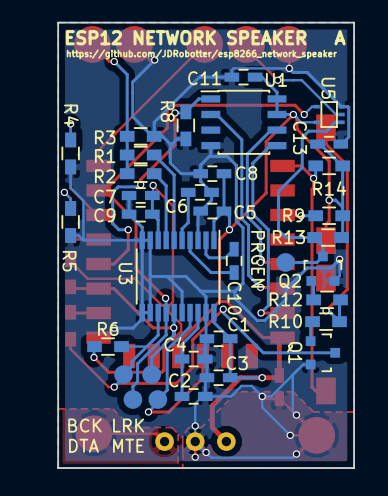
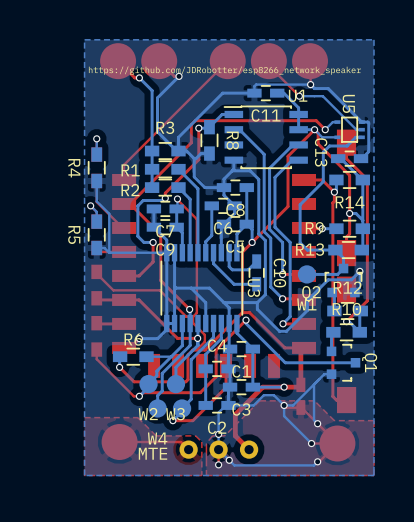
board edge: (354, 22) (58, 22) (58, 468) (354, 468) (354, 22) -> none
text: ESP12 NETWORK SPEAKER (186, 37) -> none
text: A (340, 37) -> none
C11 name position: C11 (204, 78) -> C11 (266, 115)
R8 name position: R8 (167, 111) -> R8 (232, 140)
R4 name position: R4 (71, 115) -> R4 (74, 168)
R3 name position: R3 (105, 137) -> R3 (165, 127)
C8 name position: C8 (246, 173) -> C8 (235, 209)
C7 name position: C7 (105, 196) -> C7 (165, 231)
C6 name position: C6 (176, 205) -> C6 (223, 228)
C5 name position: C5 (245, 212) -> C5 (235, 246)
C9 name position: C9 (104, 215) -> C9 (165, 249)
PRGEN name: PRGEN (257, 259) -> W1 (306, 304)
R5 name position: R5 (69, 261) -> R5 (74, 235)
U3 name position: U3 (125, 273) -> U3 (253, 288)
C10 name position: C10 (234, 298) -> C10 (279, 273)
R12 name position: R12 (285, 299) -> R12 (347, 287)
R10 name position: R10 (285, 321) -> R10 (346, 309)
C1 name position: C1 (238, 324) -> C1 (241, 371)
C4 name position: C4 (175, 344) -> C4 (217, 345)
Q1 name position: Q1 (294, 352) -> Q1 (369, 362)
C3 name position: C3 (237, 363) -> C3 (241, 409)
C2 name position: C2 (179, 380) -> C2 (217, 427)
BCK name: BCK (84, 425) -> W2 (148, 414)
LRK name: LRK (128, 425) -> W3 (175, 414)
DTA name: DTA (83, 445) -> W4 (157, 438)

